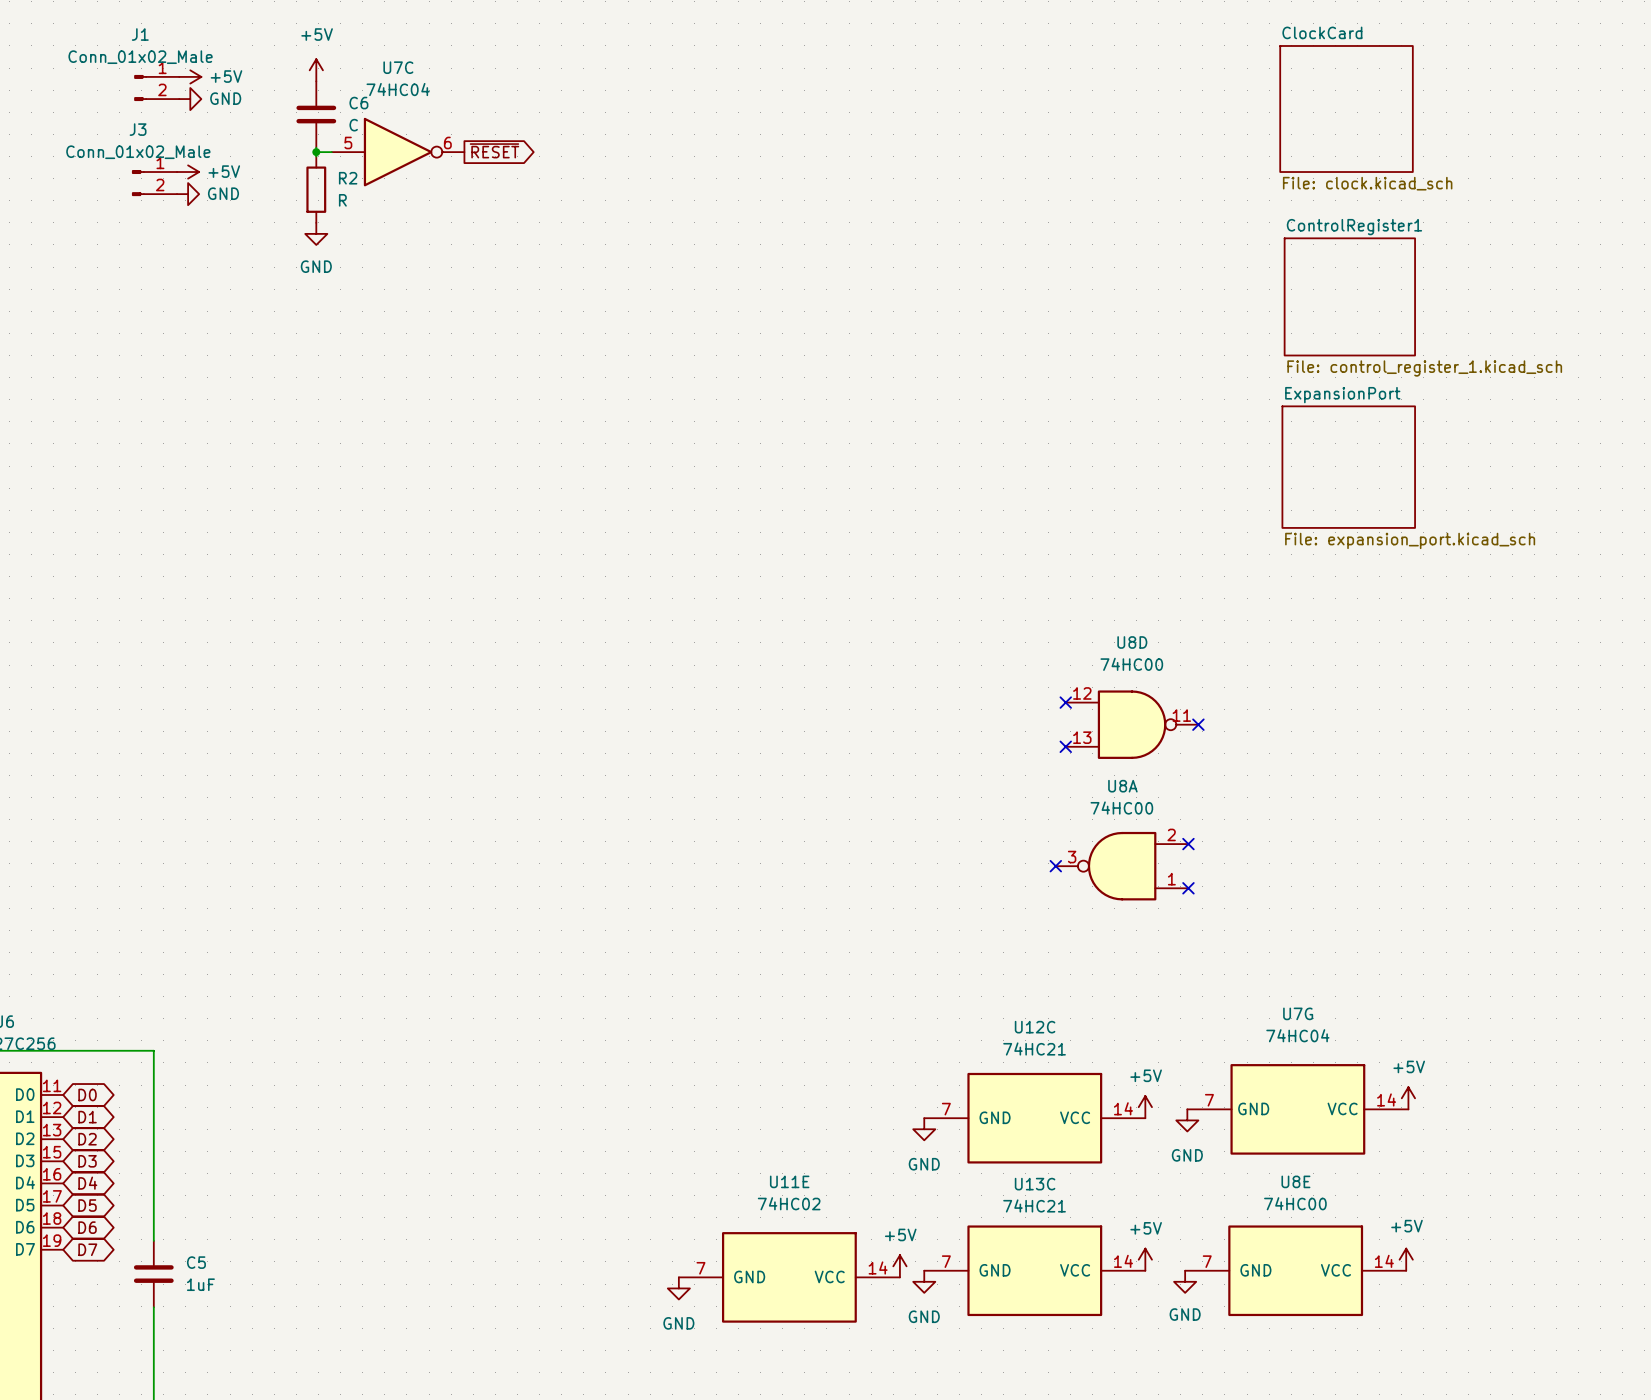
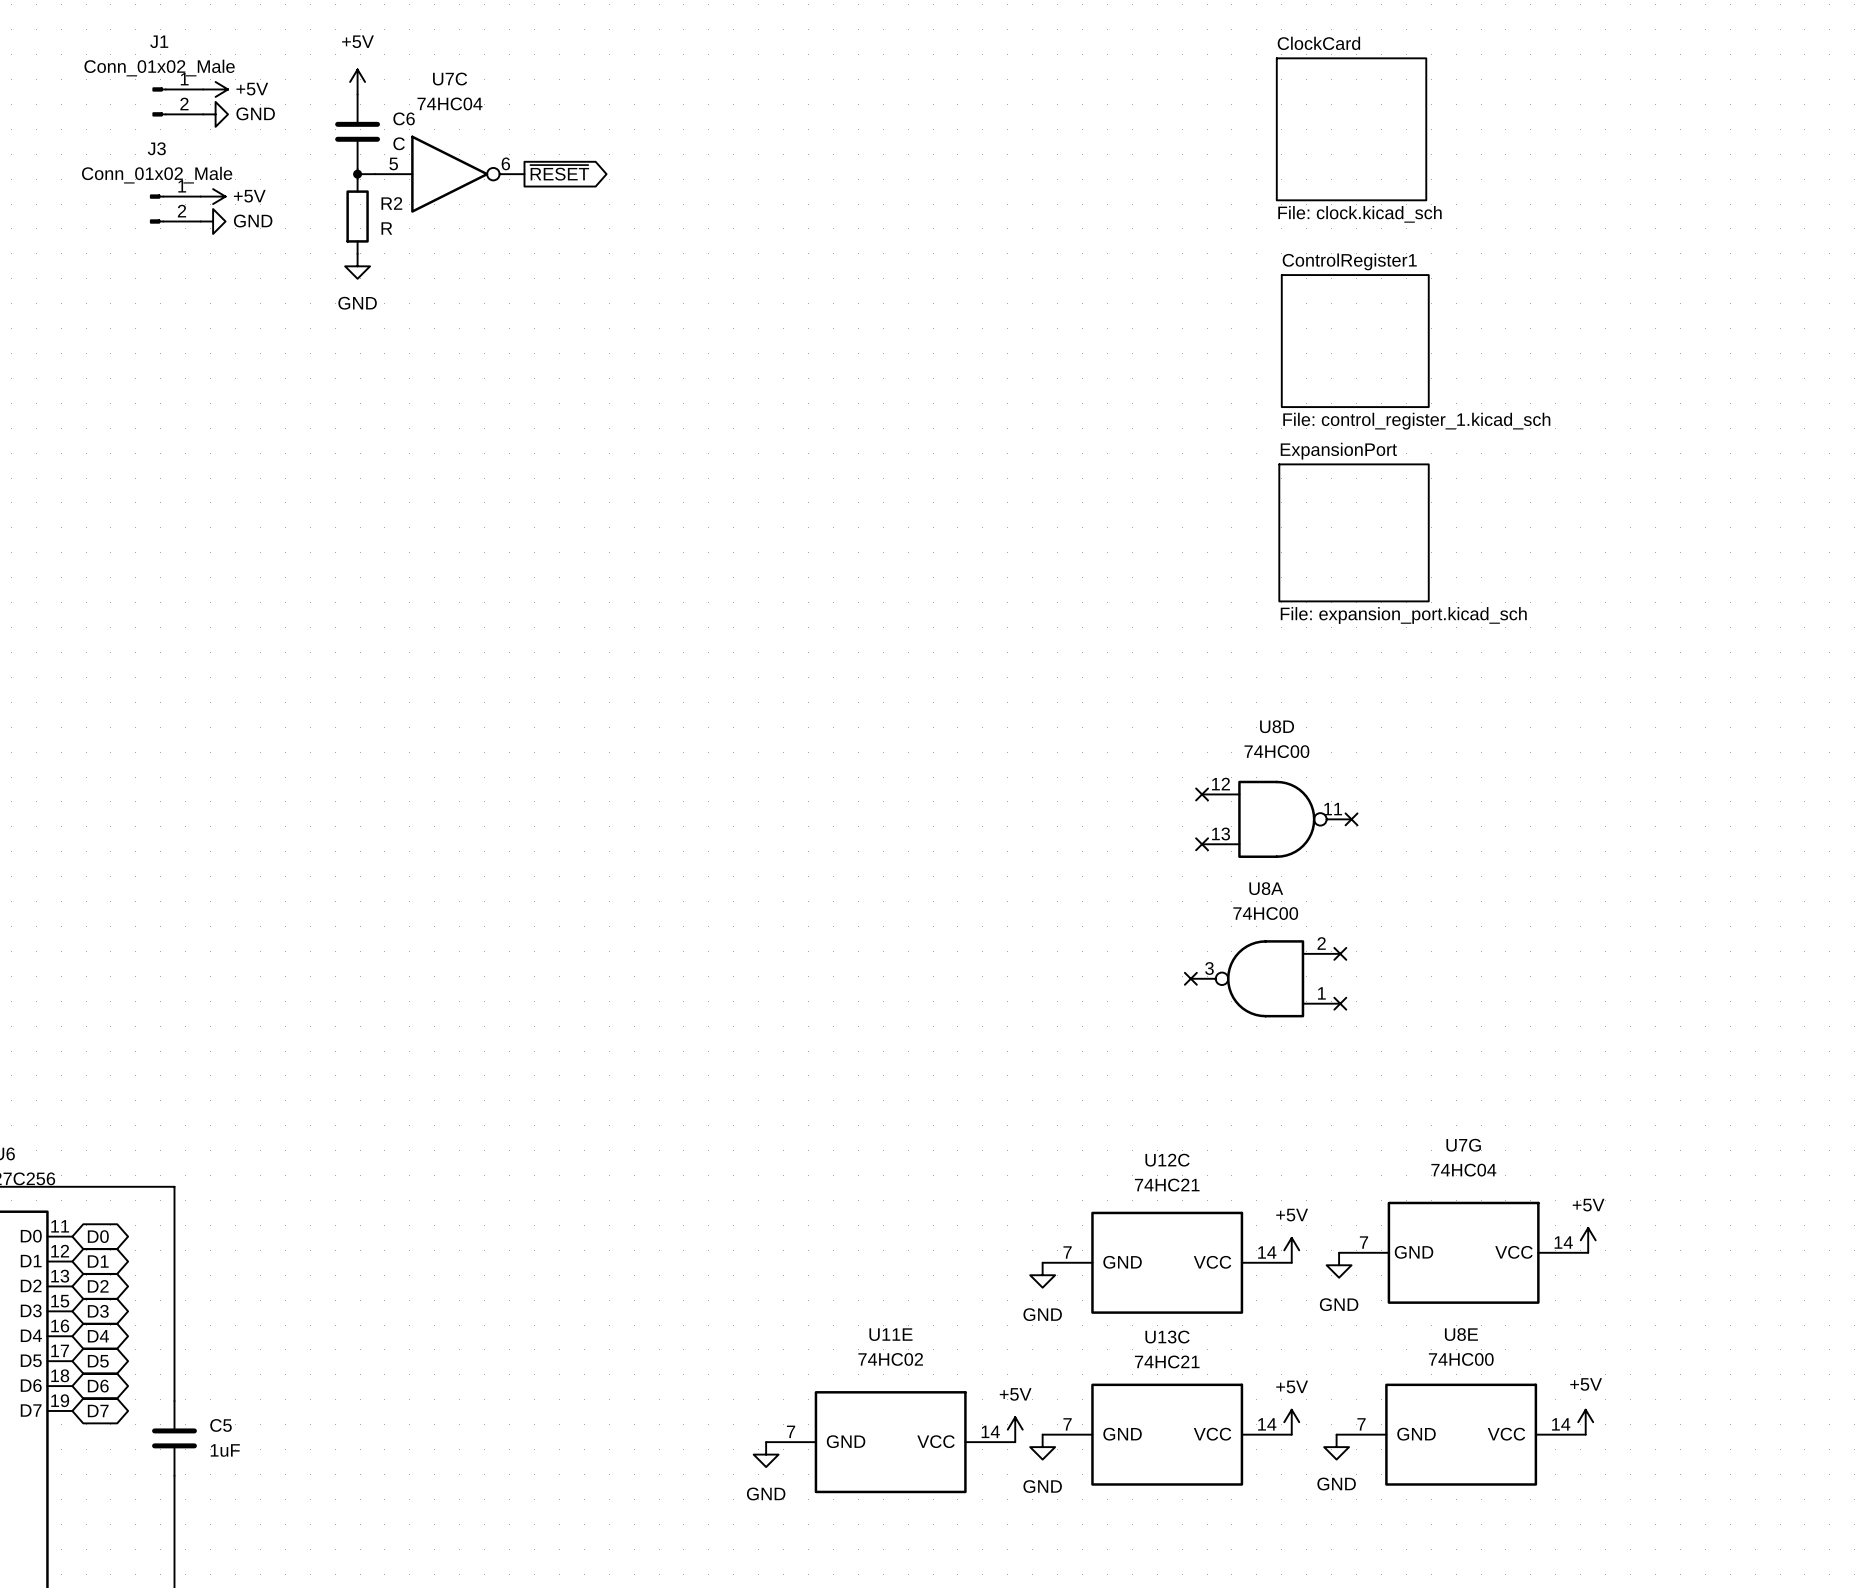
sheet ClockCard position: (1346, 109) -> (1351, 129)
sheet ControlRegister1 position: (1349, 296) -> (1355, 341)
sheet ExpansionPort position: (1348, 467) -> (1354, 532)

